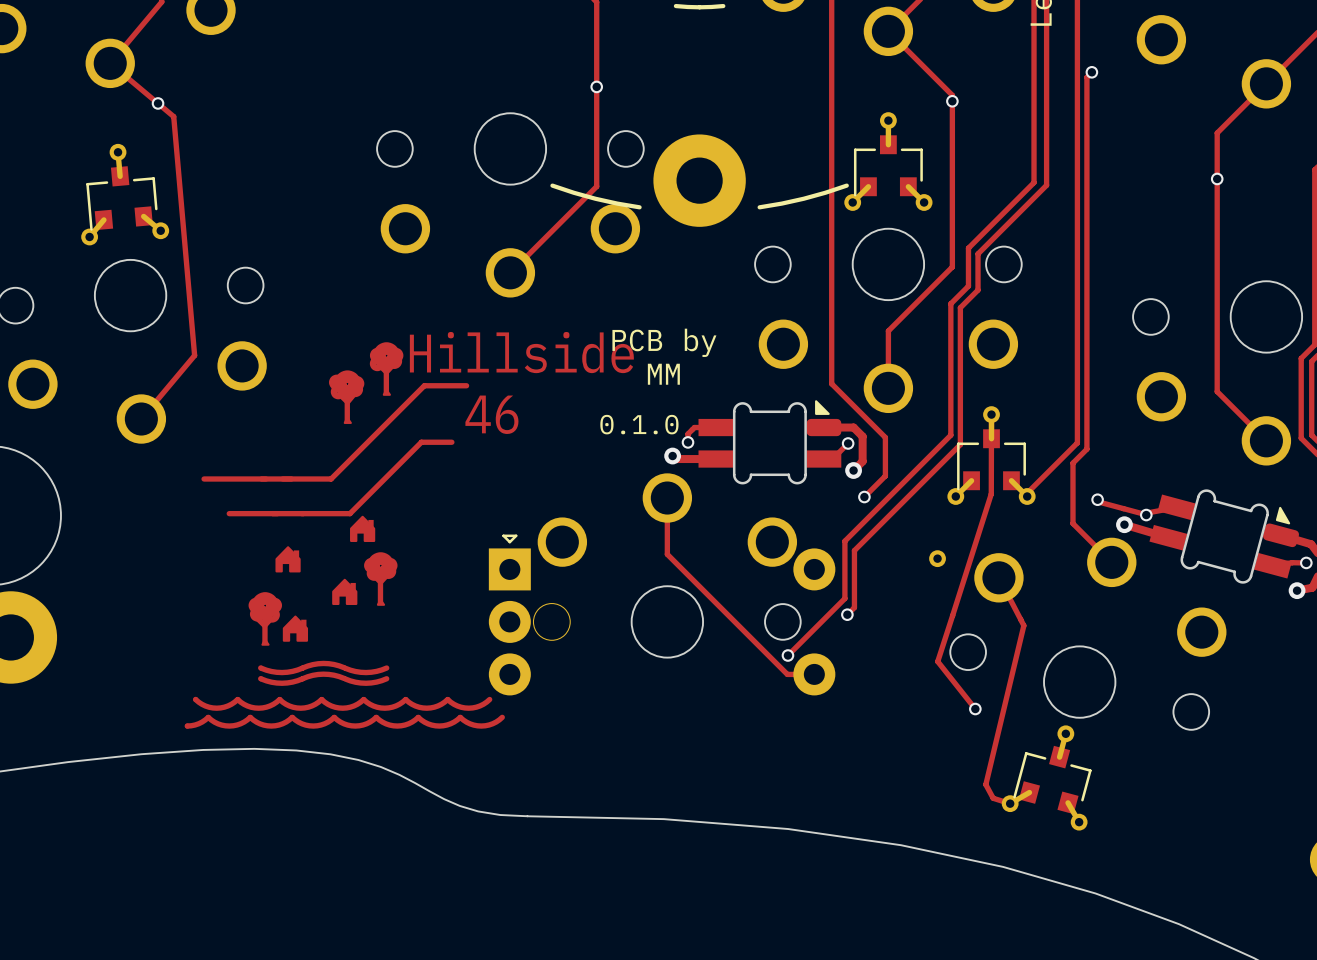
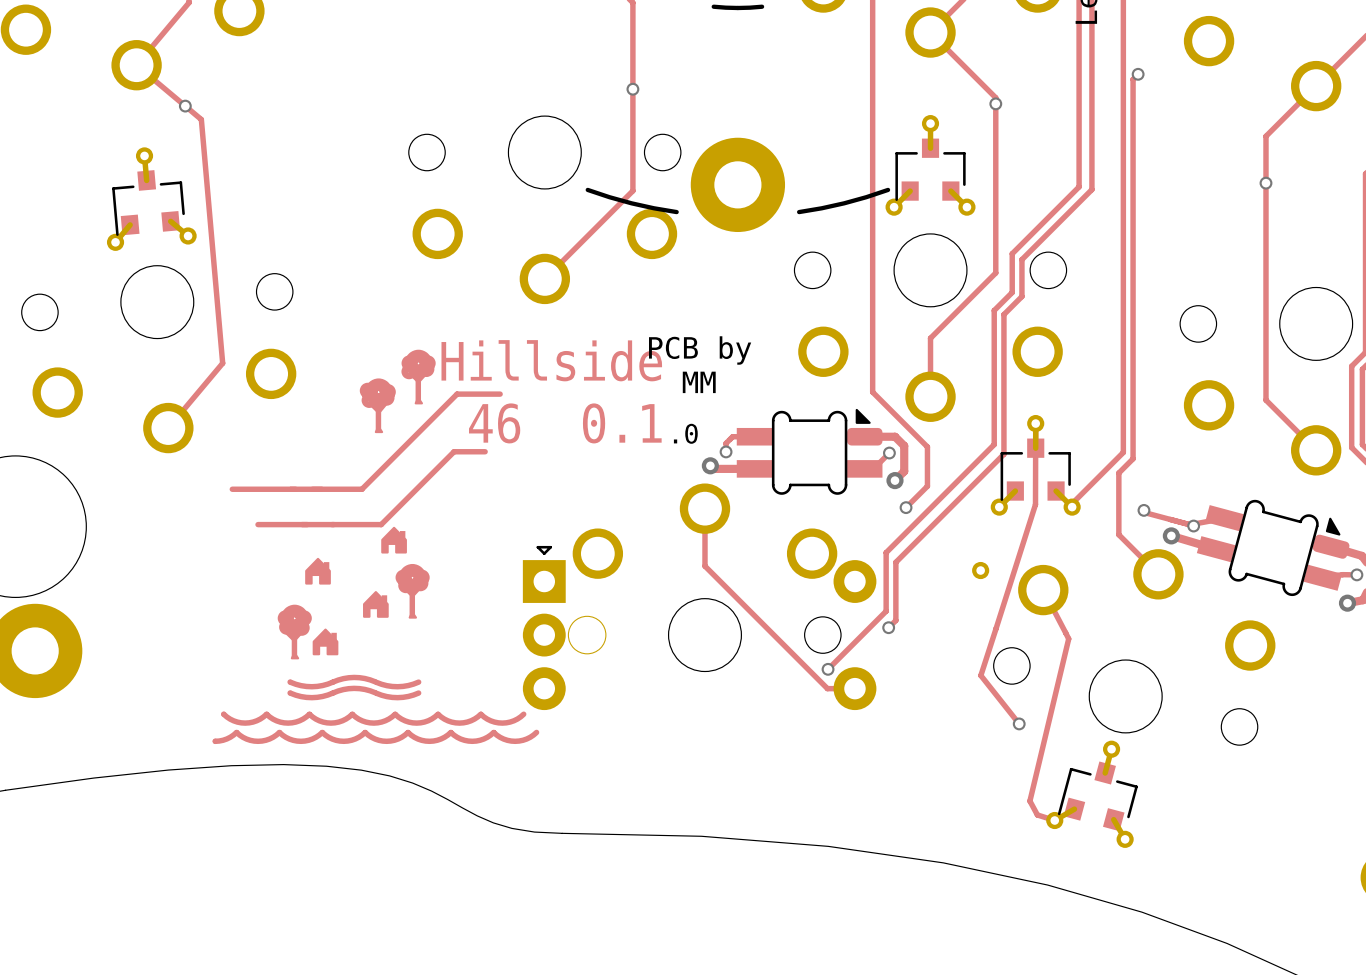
text: 46 (491, 414) -> 46 0.1 (565, 423)
text: 0.1.0 (639, 424) -> none
text: none -> .0 (685, 433)

